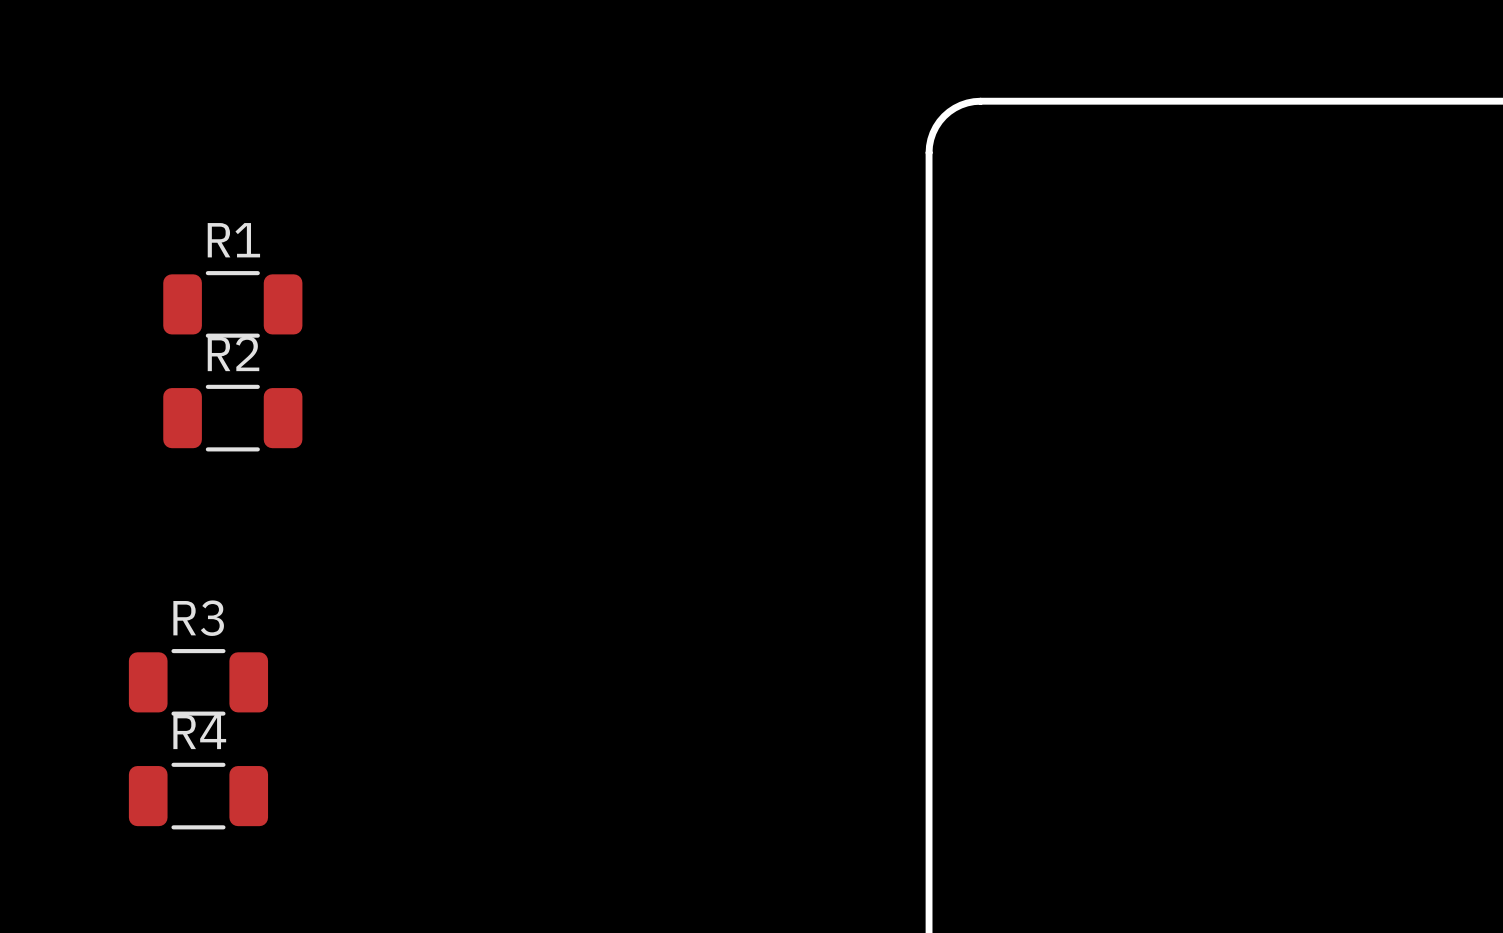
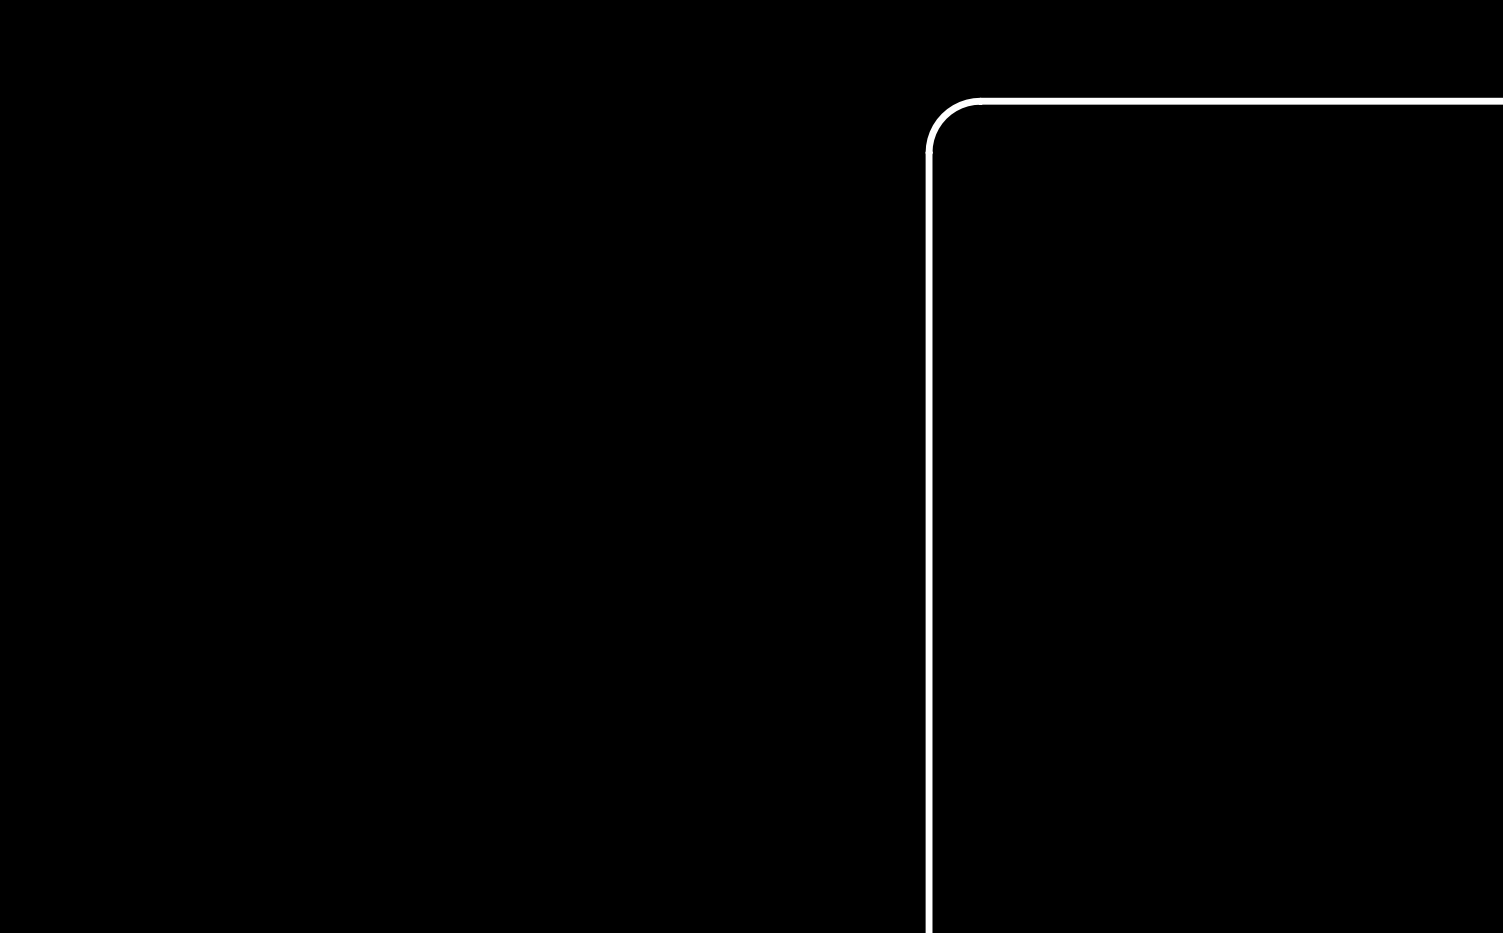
R1: (232, 304) -> none
R2: (232, 418) -> none
R3: (198, 682) -> none
R4: (198, 796) -> none

